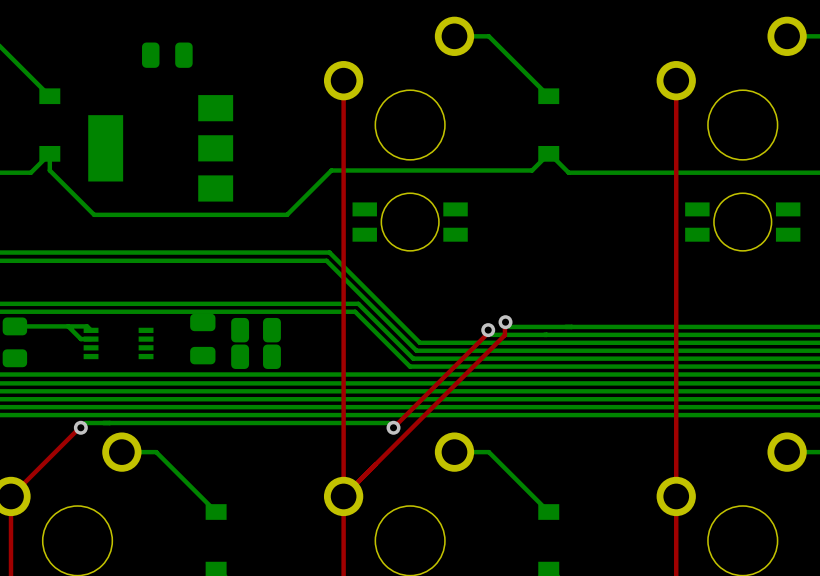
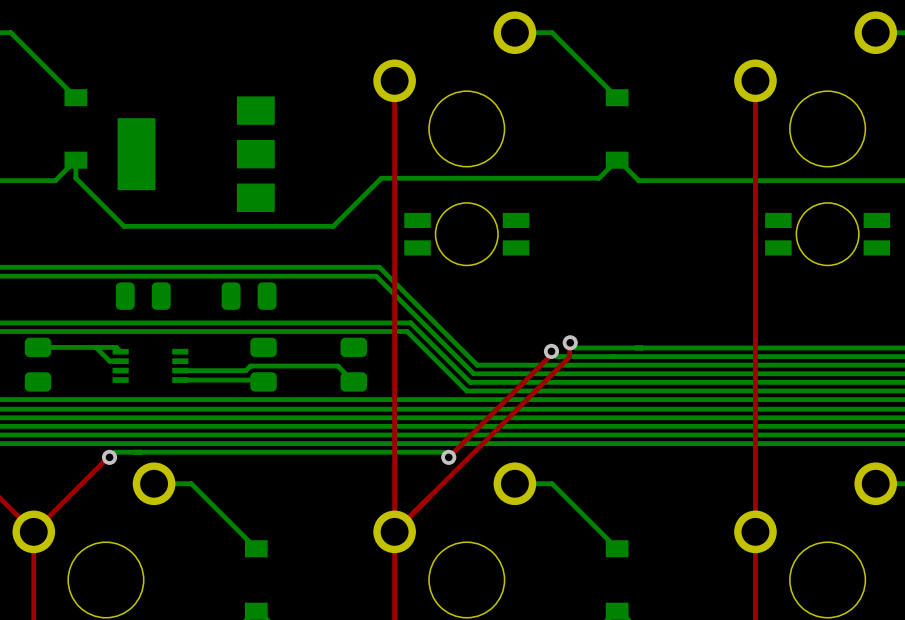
part: (167, 55) -> none
part: none -> (143, 296)
part: none -> (249, 296)
part: (256, 330) -> none
part: (202, 339) -> none
part: none -> (263, 364)
part: none -> (353, 364)
bottom track: none -> (180, 370) (245, 370) (250, 366) (337, 366) (353, 381)
bottom track: none -> (180, 380) (261, 380) (263, 381)
part: (256, 356) -> none

